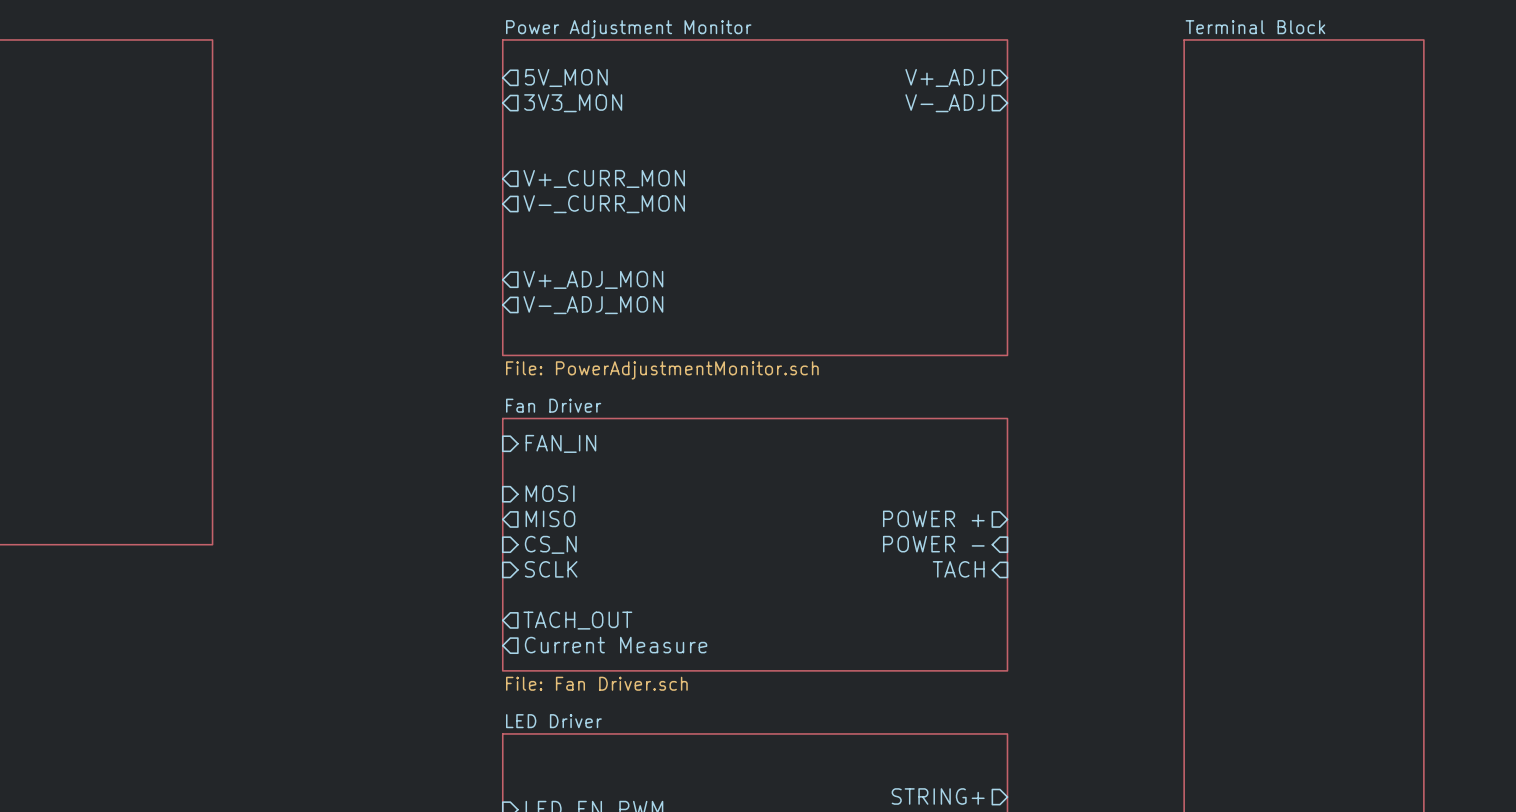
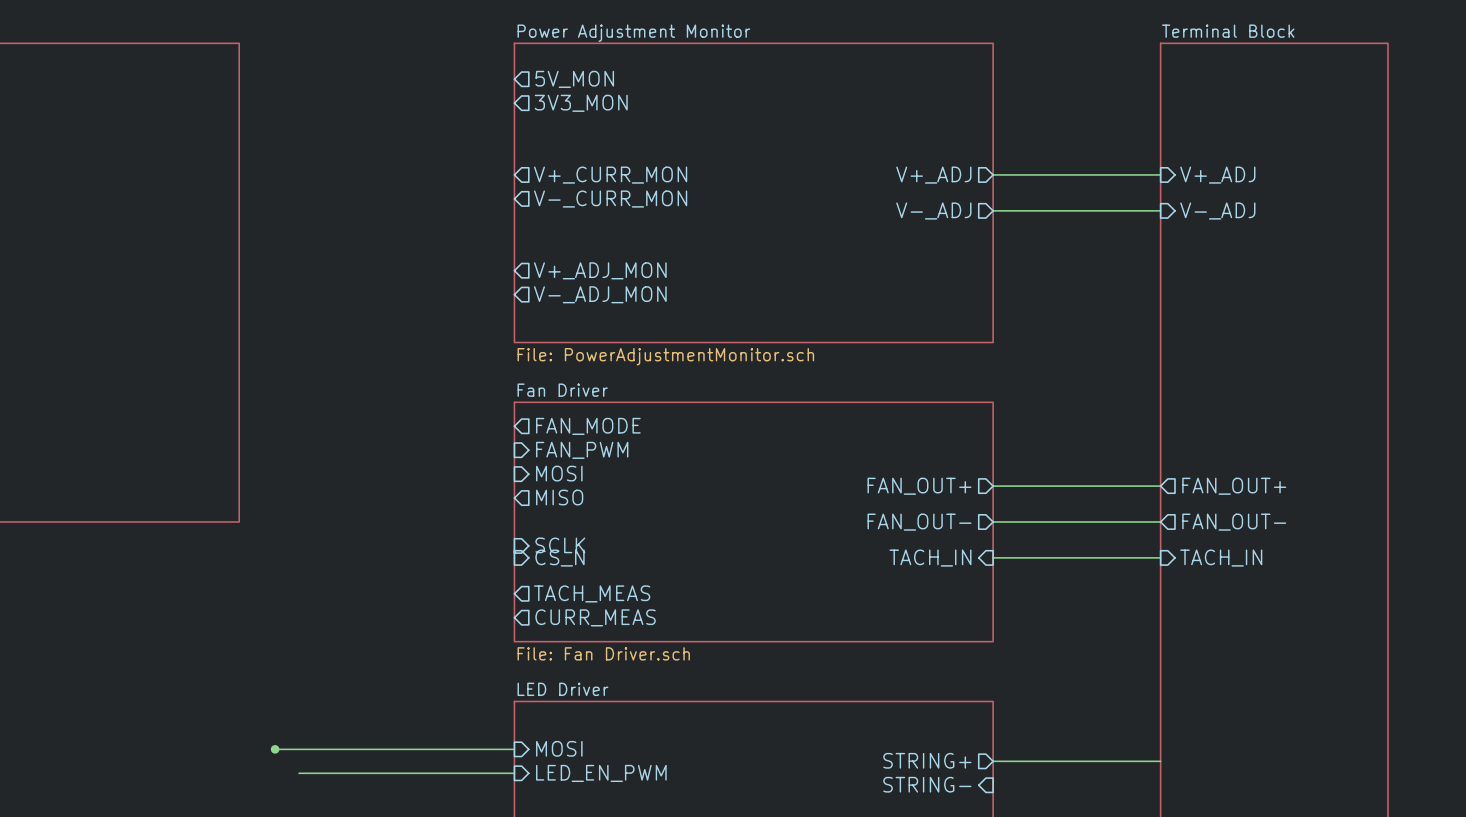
sheet pin position: V+_ADJ (945, 77) -> V+_ADJ (933, 175)
sheet pin position: V-_ADJ (945, 103) -> V-_ADJ (933, 211)
wire: none -> (993, 174) (1160, 174)
sheet pin: none -> V+_ADJ (1217, 175)
wire: none -> (993, 210) (1160, 210)
sheet pin: none -> V-_ADJ (1217, 211)
sheet pin shape: input (560, 443) -> output (588, 426)
sheet pin: FAN_IN (560, 443) -> FAN_MODE (588, 426)
sheet pin: none -> FAN_PWM (582, 450)
wire: none -> (993, 486) (1160, 486)
sheet pin: none -> FAN_OUT+ (919, 486)
sheet pin: none -> FAN_OUT+ (1234, 486)
sheet pin: POWER + (933, 518) -> none
sheet pin position: CS_N (550, 544) -> CS_N (560, 558)
sheet pin shape: input (933, 544) -> output (919, 522)
sheet pin: POWER - (933, 544) -> FAN_OUT- (919, 522)
wire: none -> (993, 521) (1160, 521)
sheet pin: none -> FAN_OUT- (1234, 522)
sheet pin: TACH (958, 569) -> TACH_IN (930, 558)
wire: none -> (993, 557) (1160, 557)
sheet pin: none -> TACH_IN (1221, 558)
sheet pin: TACH_OUT (577, 620) -> TACH_MEAS (592, 593)
sheet pin: Current Measure (616, 645) -> CURR_MEAS (595, 617)
sheet pin: none -> MOSI (559, 748)
wire: none -> (275, 749) (514, 749)
junction: none -> (275, 749)
wire: none -> (993, 761) (1160, 761)
wire: none -> (299, 773) (514, 773)

